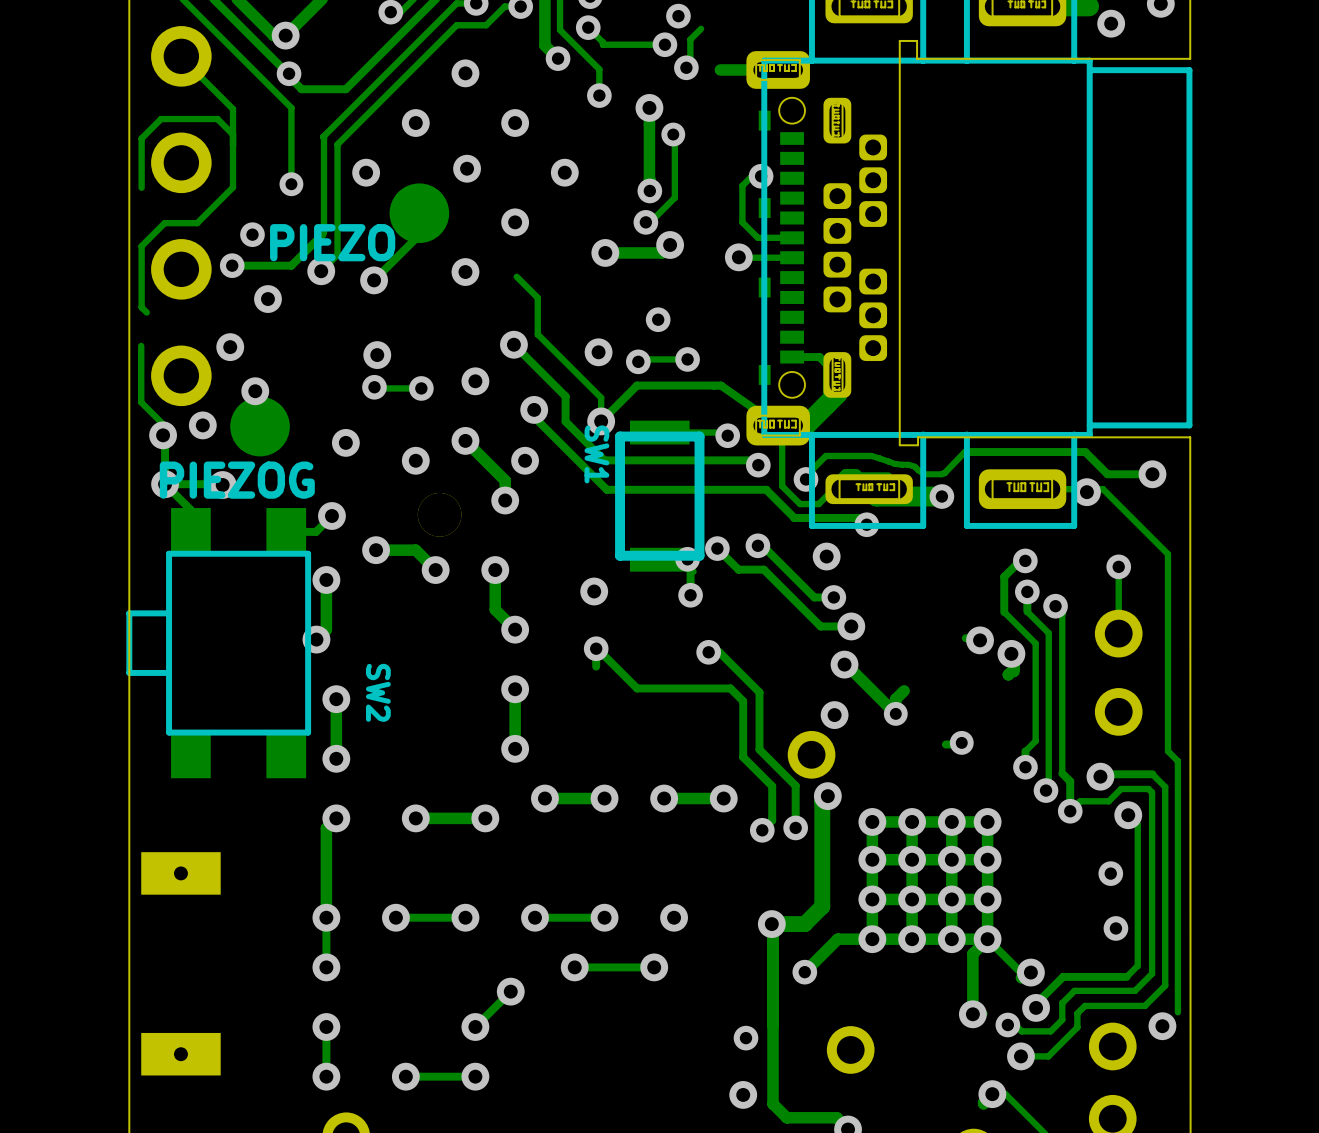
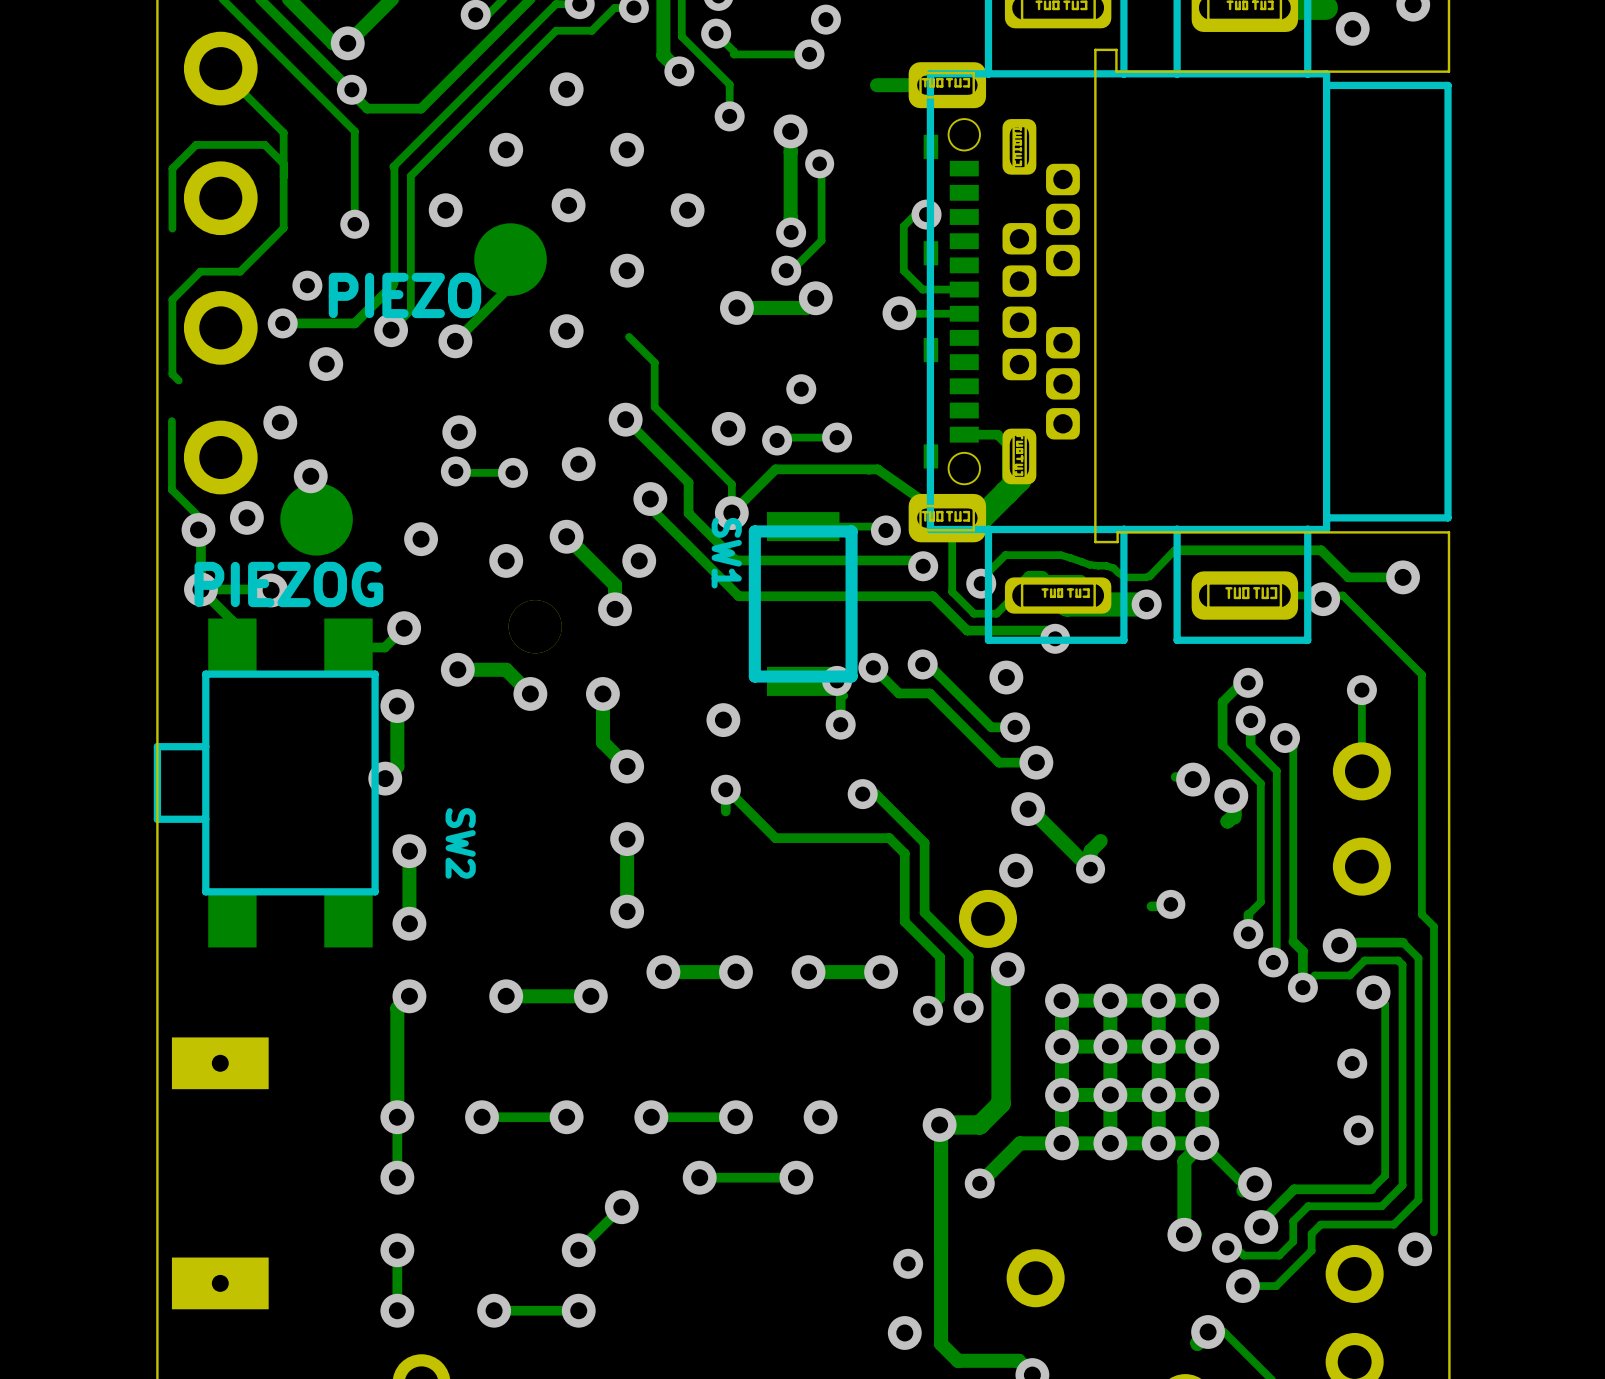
track: (701, 28) (690, 39) (690, 63) (686, 67) -> none
via: (686, 67) -> none

